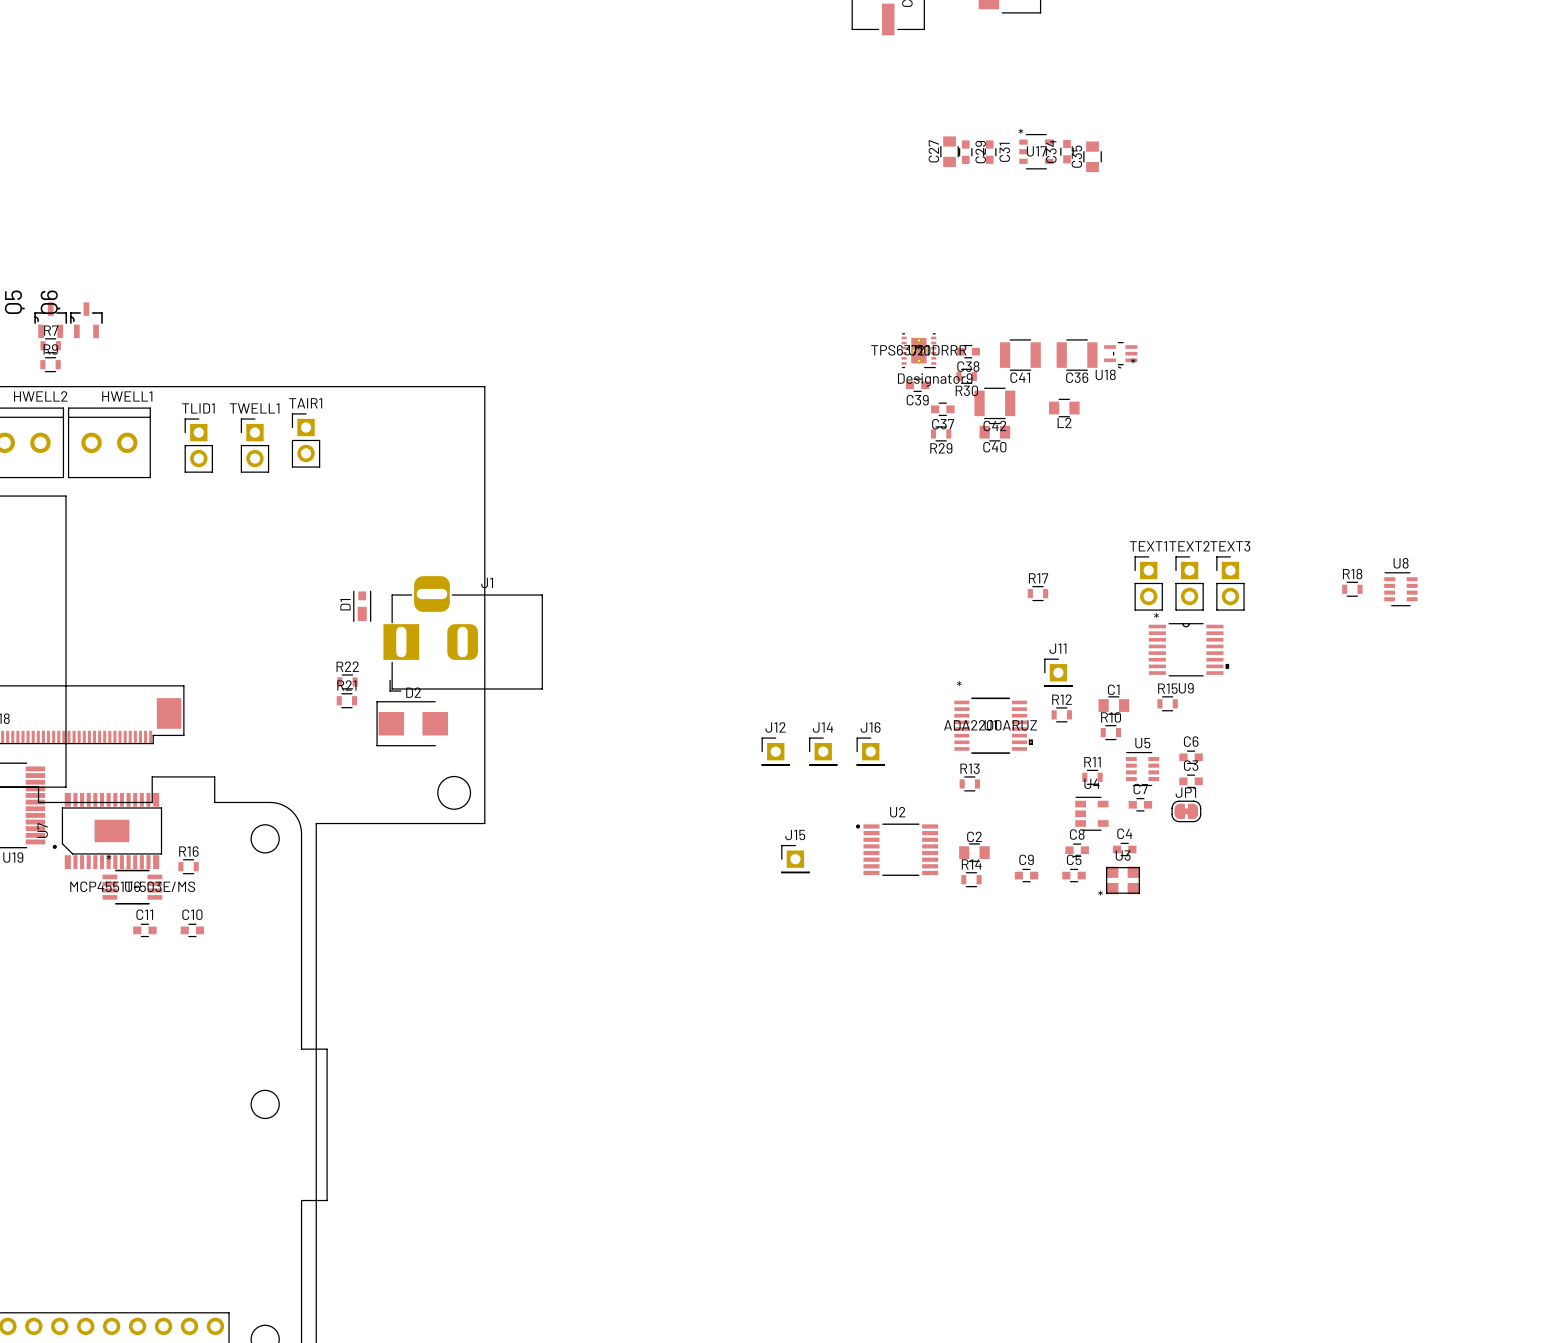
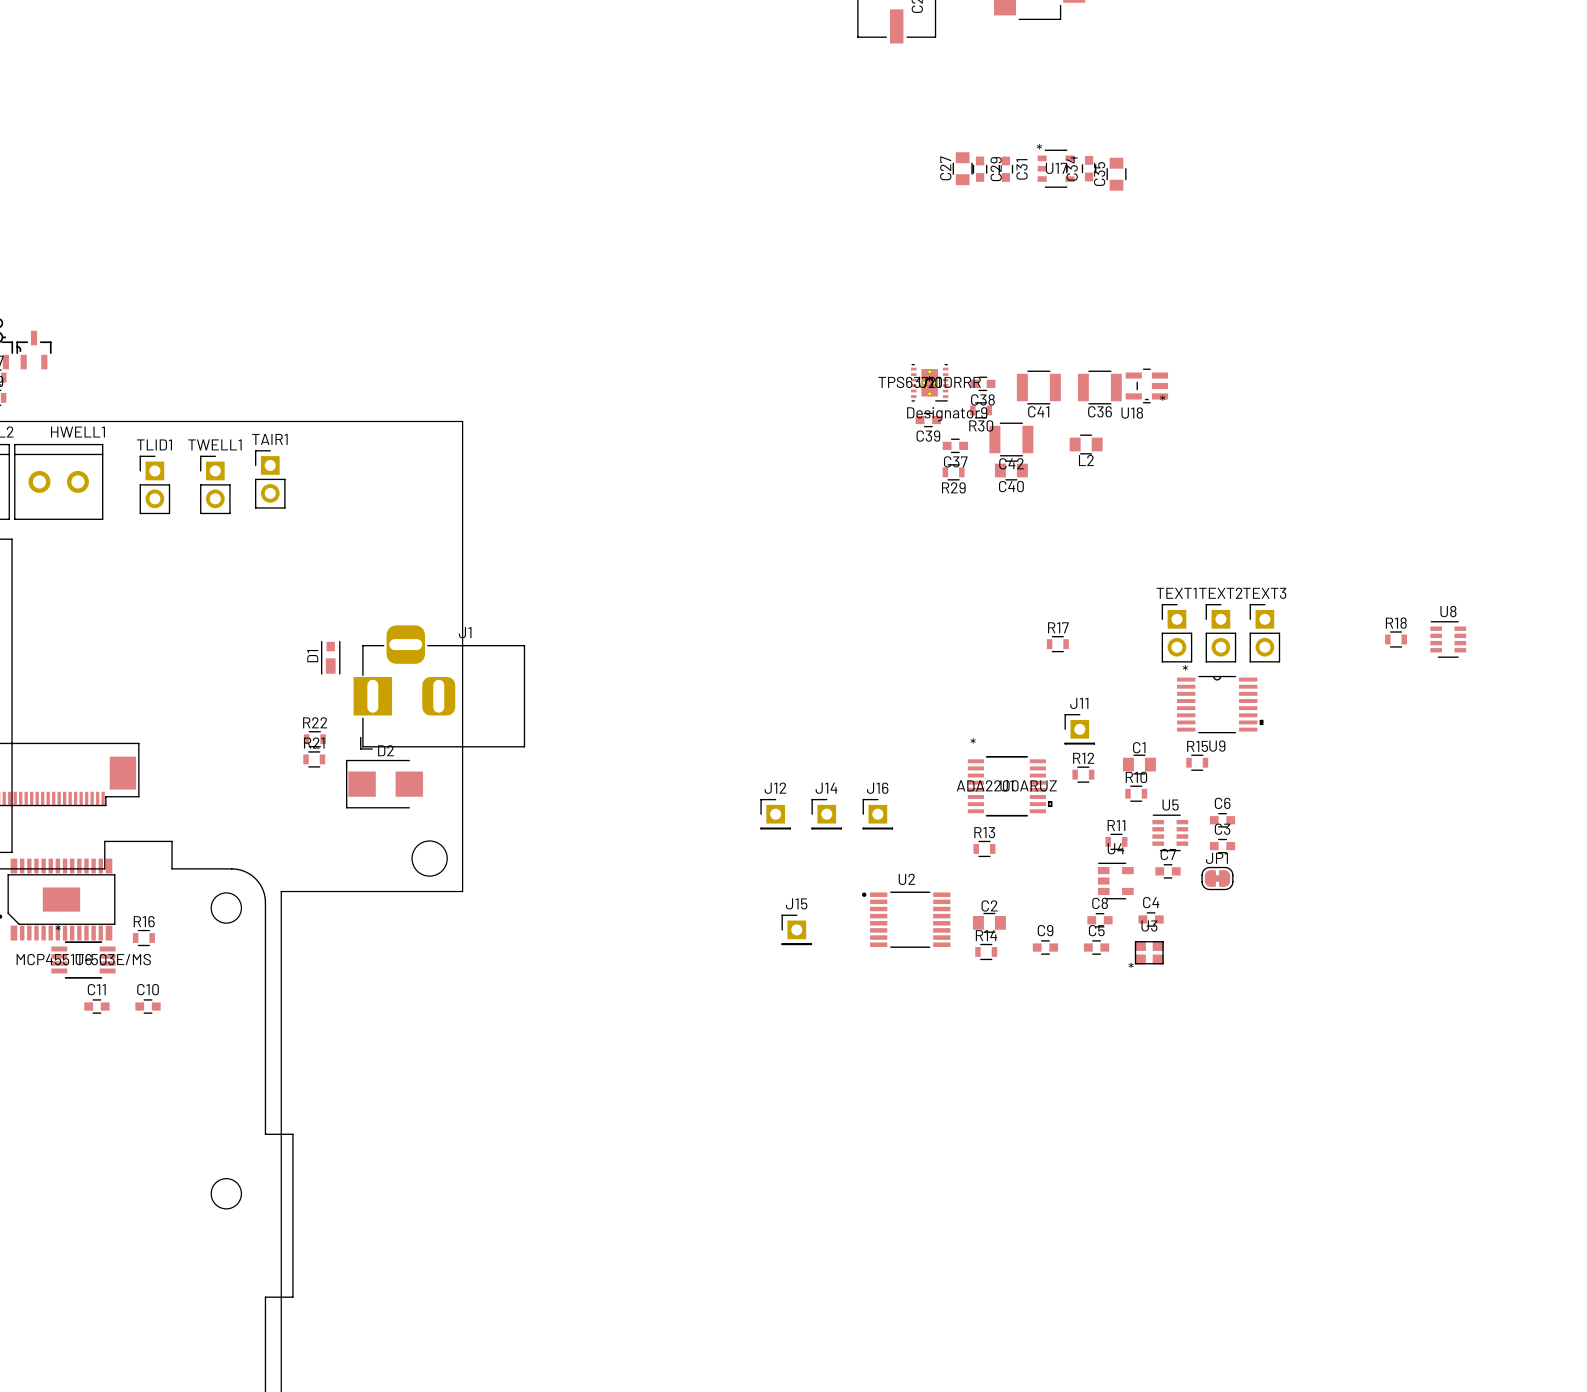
U18 footprint: [1104, 342, 1138, 369] -> [1125, 368, 1169, 404]
U3 footprint: [1106, 866, 1140, 895] -> [1134, 941, 1164, 965]

